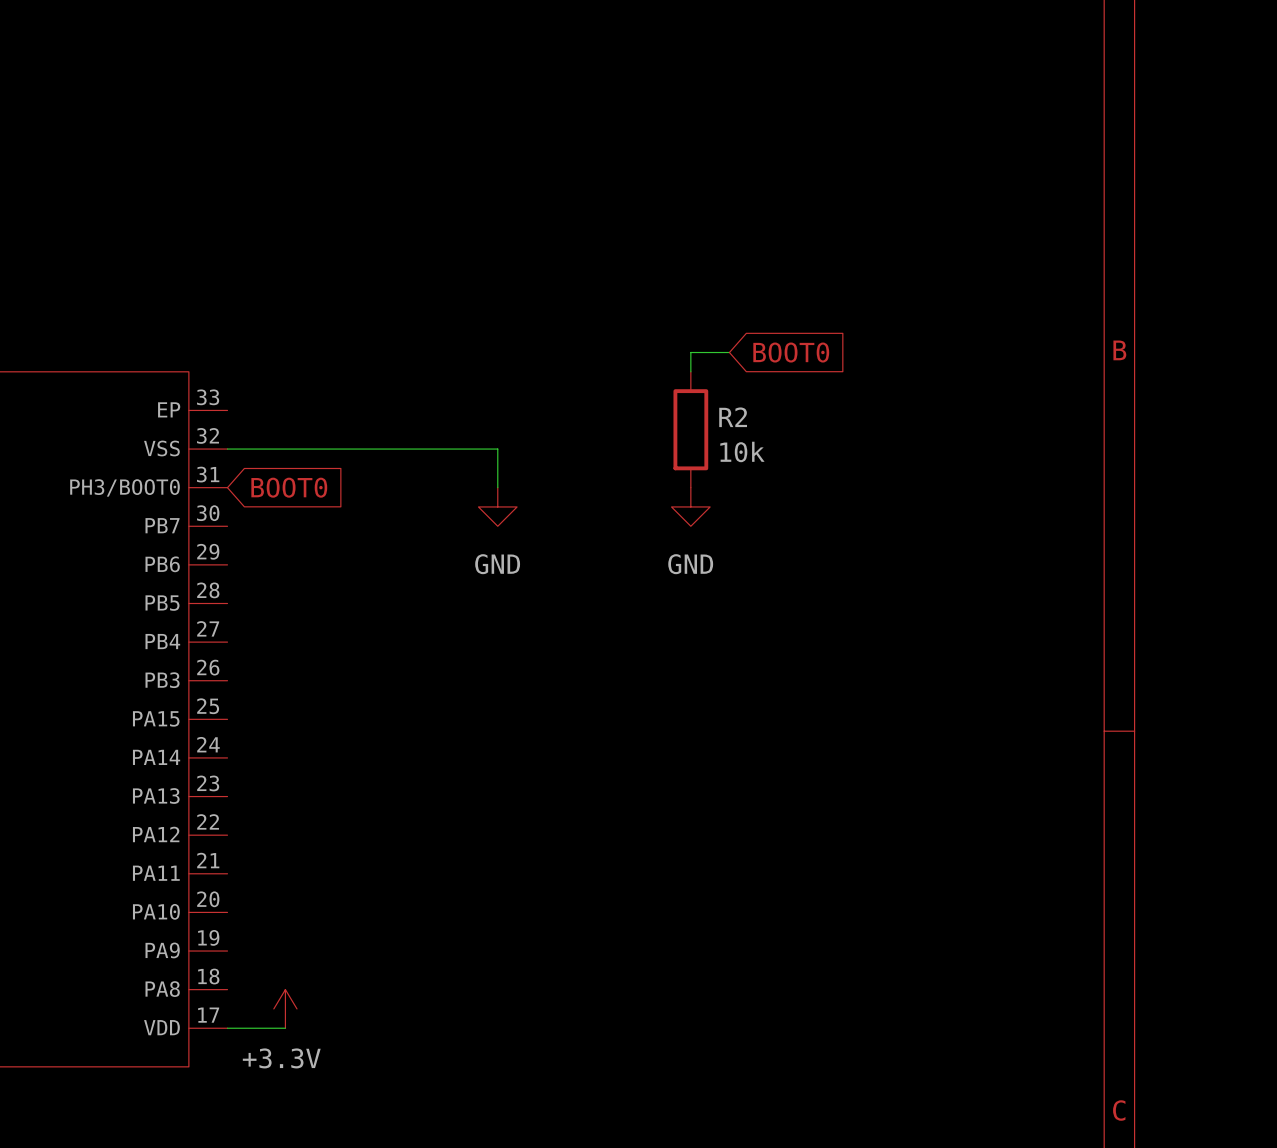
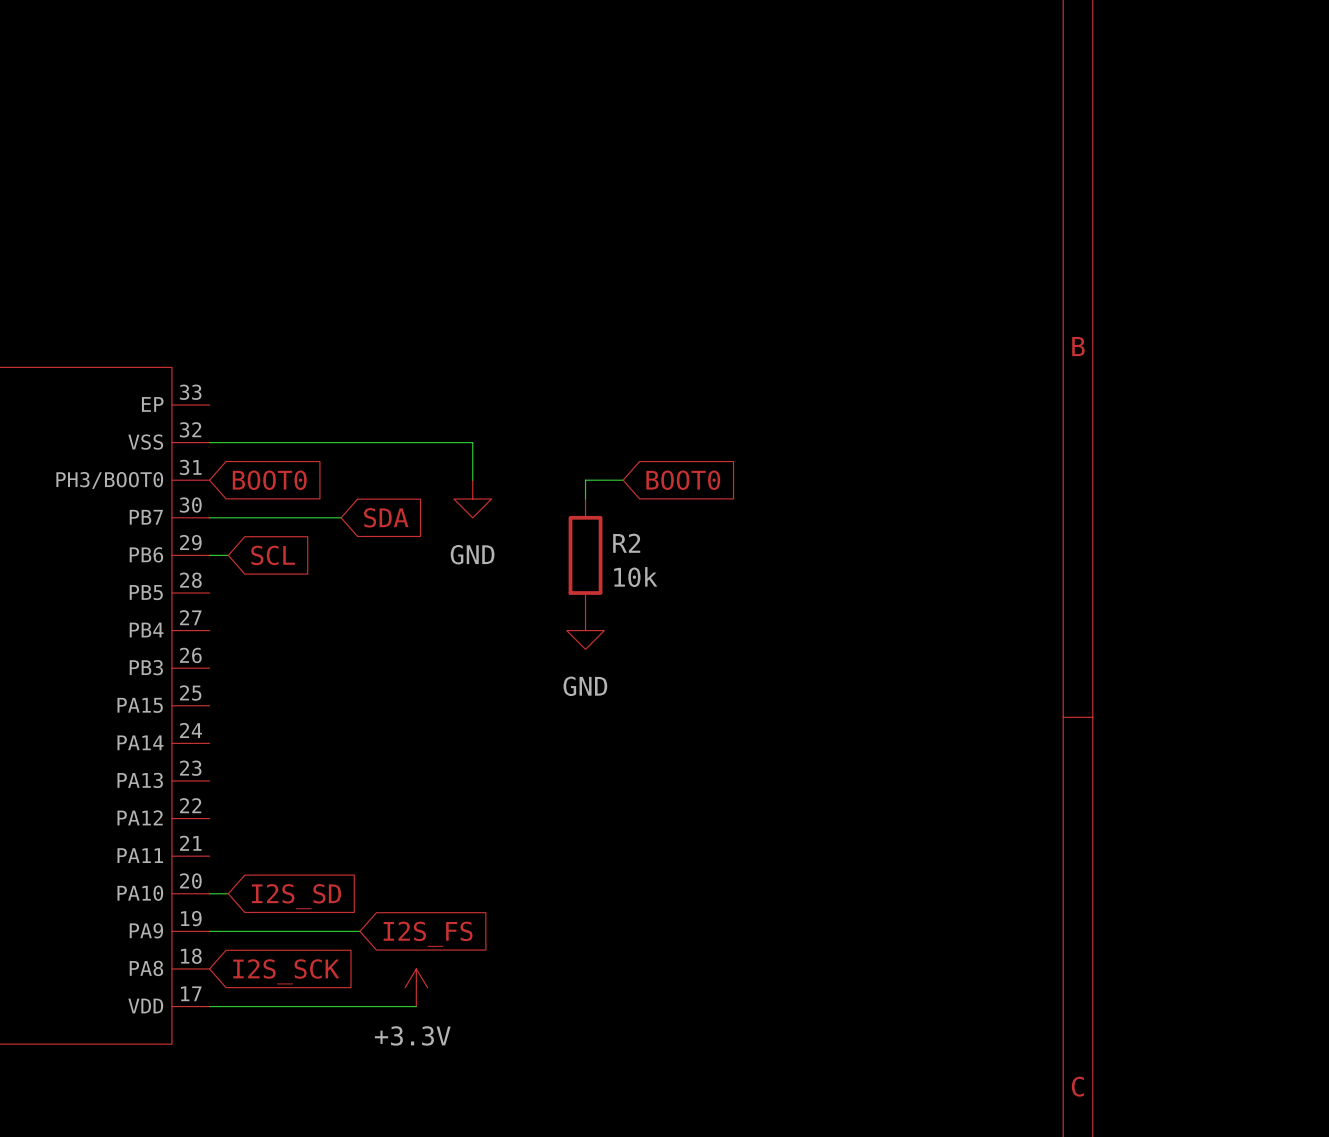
wire: (729, 352) (690, 352) (690, 371) -> (623, 480) (585, 480) (585, 499)
global label position: BOOT0 (791, 352) -> BOOT0 (683, 480)
R2 position: (690, 429) -> (585, 555)
power symbol position: GND (690, 506) -> GND (585, 630)
wire: none -> (209, 517) (341, 517)
global label: none -> SDA (386, 517)
wire: none -> (209, 555) (228, 555)
global label: none -> SCL (273, 555)
wire: none -> (209, 893) (228, 893)
global label: none -> I2S_SD (296, 896)
wire: none -> (209, 931) (359, 931)
global label: none -> I2S_FS (428, 934)
global label: none -> I2S_SCK (286, 971)
power symbol position: +3.3V (285, 1008) -> +3.3V (416, 987)
wire: none -> (265, 1006) (416, 1006)

